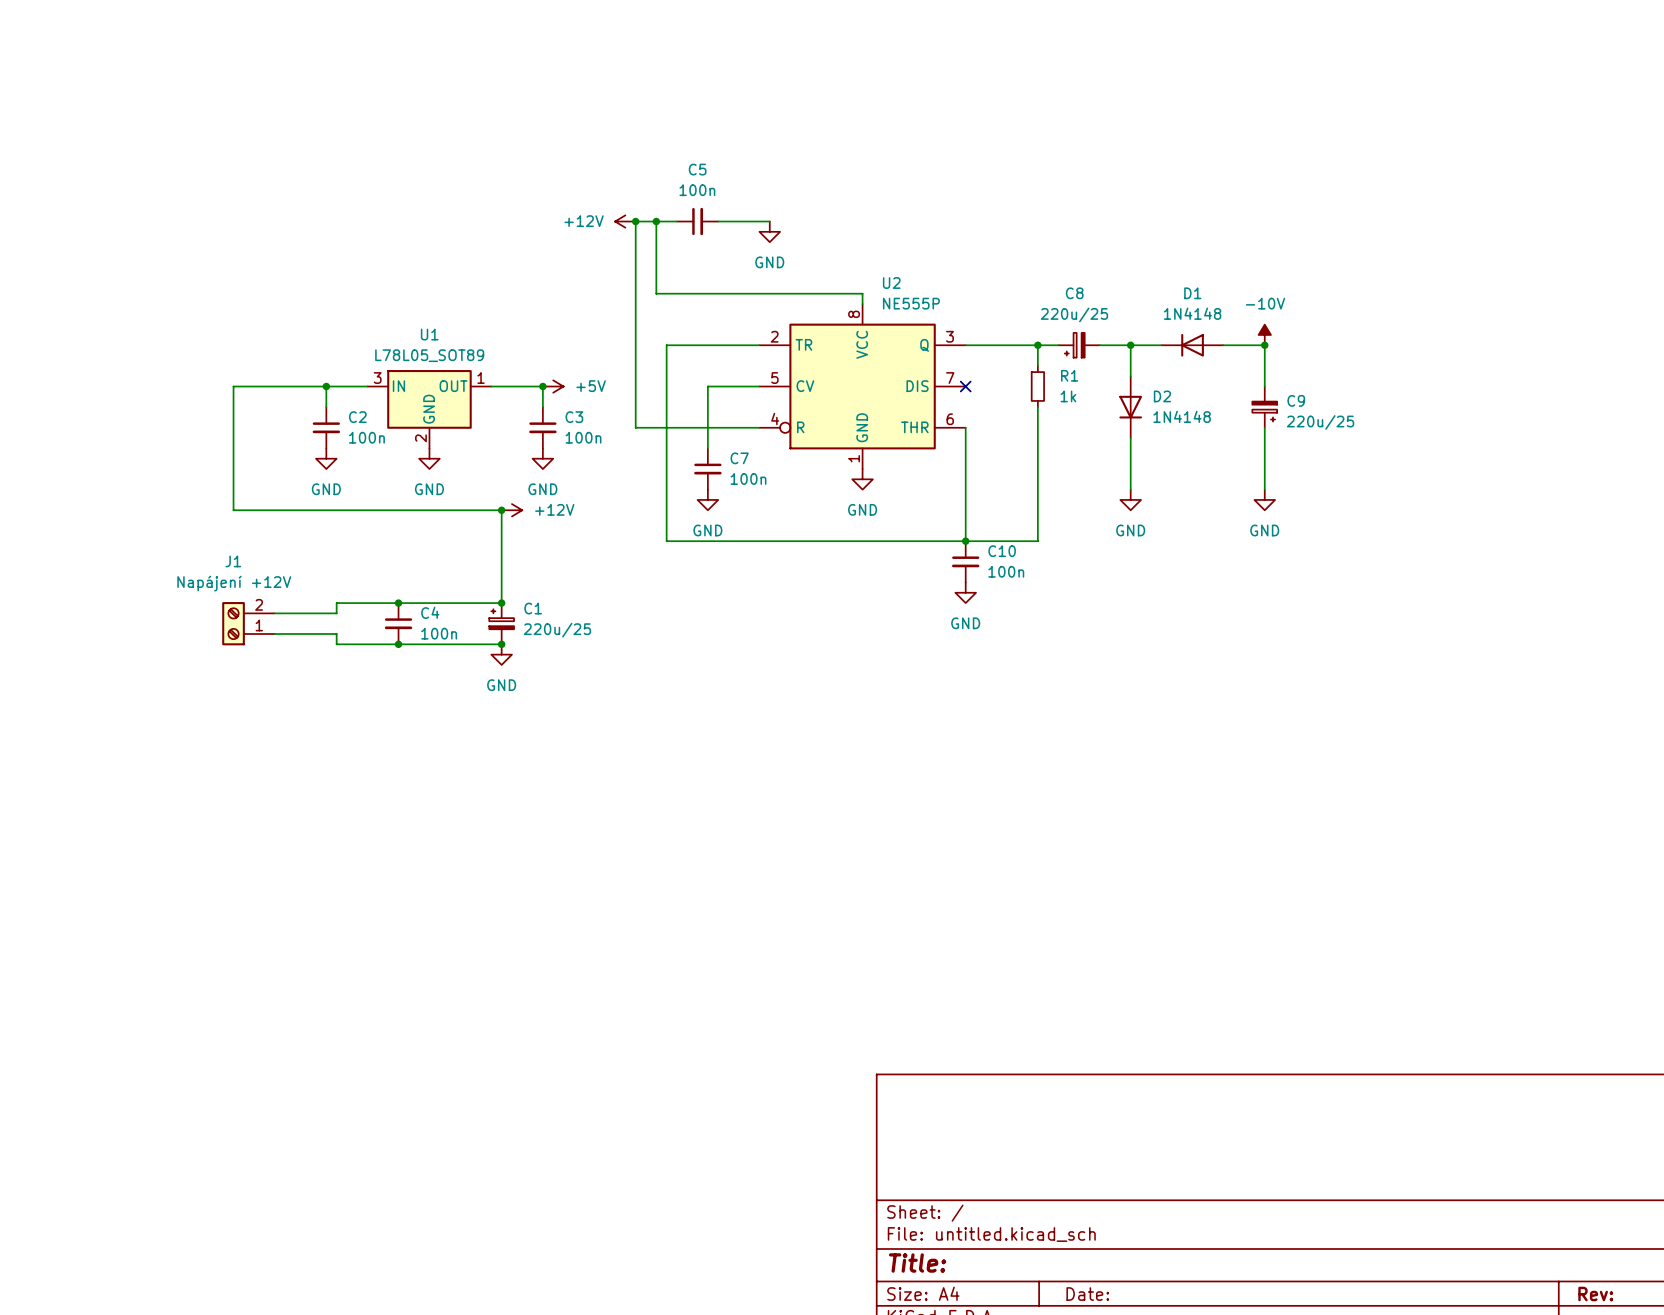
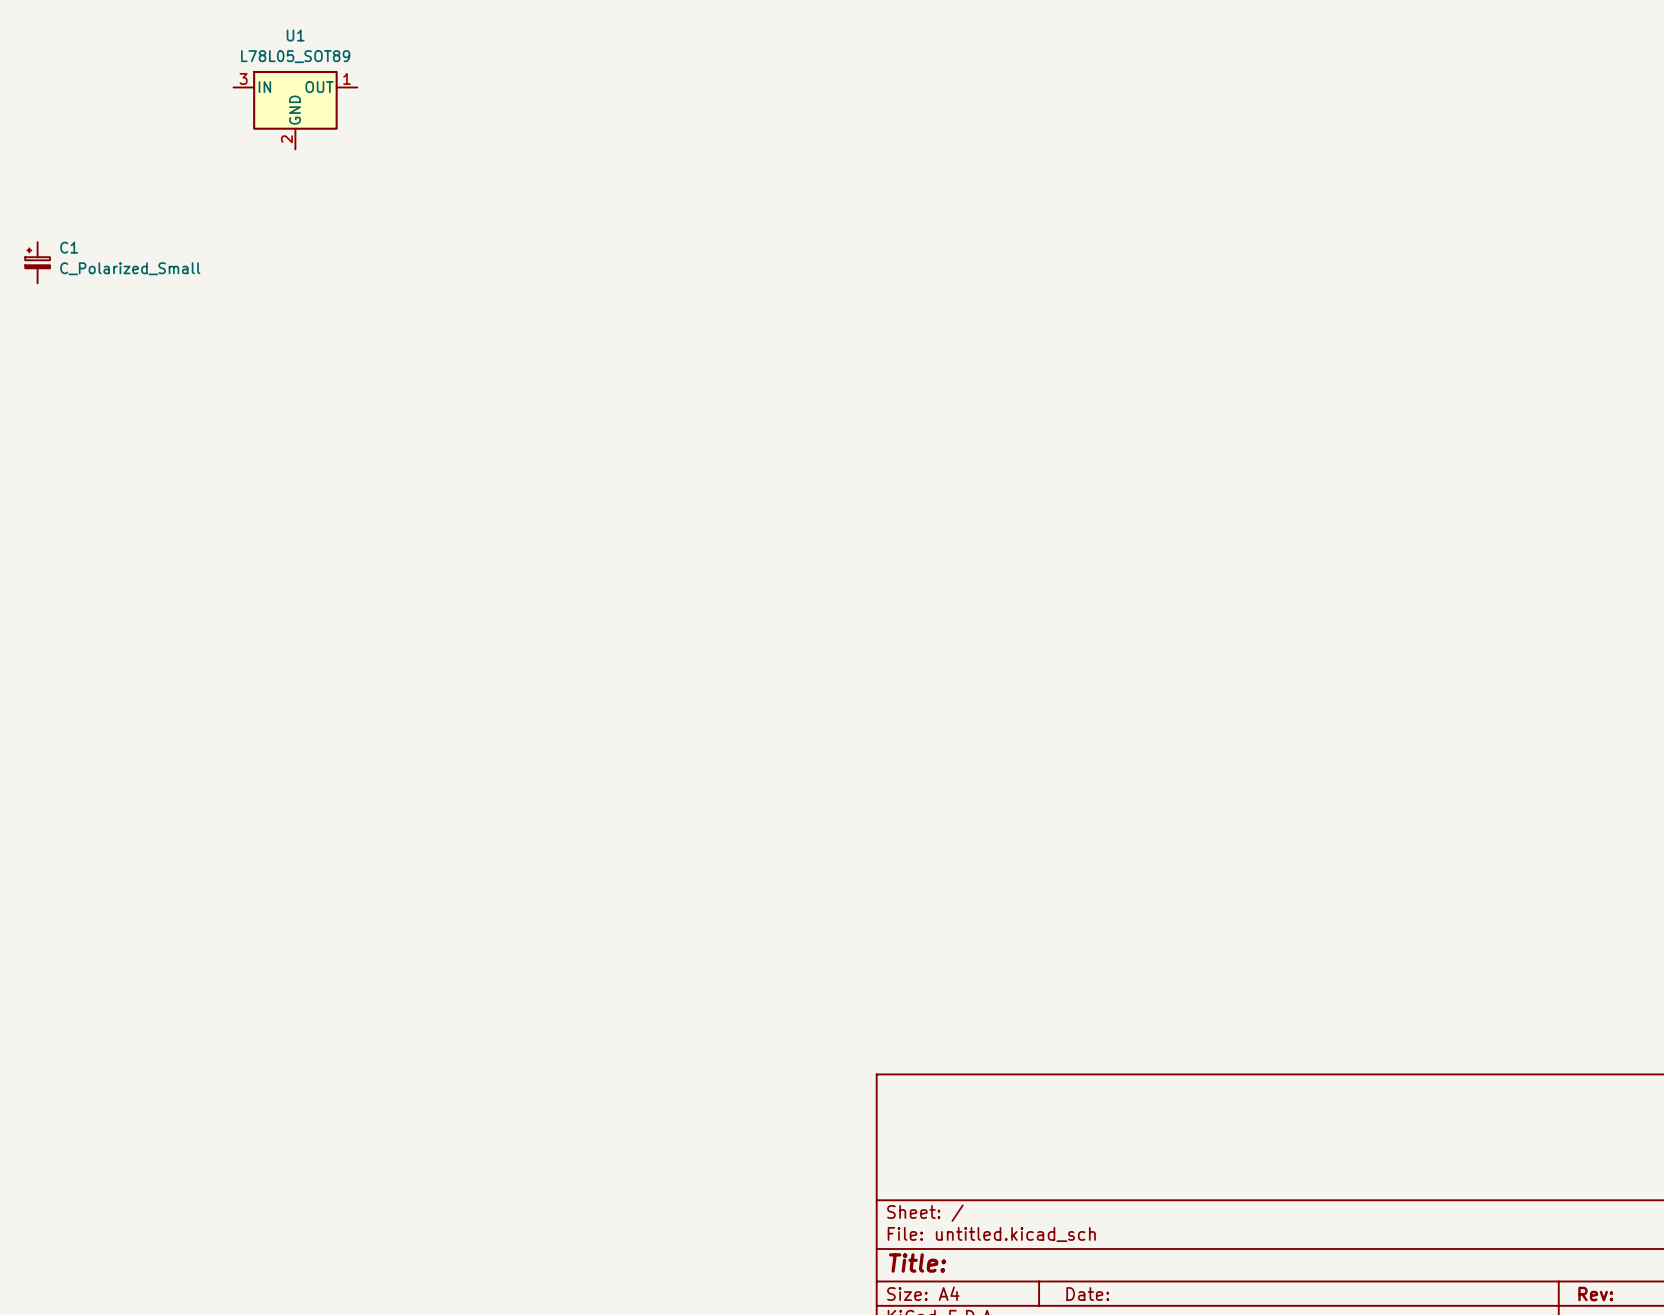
power symbol: +12V (625, 221) -> none
junction: (635, 221) -> none
wire: (656, 221) (656, 293) (862, 293) (862, 304) -> none
junction: (656, 221) -> none
wire: (676, 221) (635, 221) (635, 427) (759, 427) -> none
C5: 100n (697, 221) -> none
wire: (718, 221) (769, 221) -> none
power symbol: GND (769, 231) -> none
power symbol: -10V (1264, 334) -> none
wire: (759, 345) (666, 345) (666, 541) (1037, 541) (1037, 407) -> none
wire: (965, 345) (1058, 345) -> none
wire: (1037, 345) (1037, 365) -> none
junction: (1037, 345) -> none
C8: 220u/25 (1079, 345) -> none
wire: (1099, 345) (1161, 345) -> none
wire: (1130, 345) (1130, 376) -> none
junction: (1130, 345) -> none
D1: 1N4148 (1192, 345) -> none
wire: (1223, 345) (1264, 345) (1264, 386) -> none
junction: (1264, 345) -> none
wire: (326, 386) (326, 407) -> none
junction: (326, 386) -> none
wire: (367, 386) (233, 386) (233, 510) (501, 510) (501, 603) (336, 603) (336, 613) (274, 613) -> none
wire: (491, 386) (542, 386) (542, 407) -> none
junction: (542, 386) -> none
power symbol: +5V (553, 386) -> none
wire: (759, 386) (707, 386) (707, 448) -> none
U2: NE555P (862, 386) -> none
no-connect mark: (965, 386) -> none
R1: 1k (1037, 386) -> none
D2: 1N4148 (1130, 407) -> none
C9: 220u/25 (1264, 407) -> none
U1 position: (429, 409) -> (295, 110)
C2: 100n (326, 427) -> none
C3: 100n (542, 427) -> none
wire: (965, 427) (965, 541) -> none
wire: (1264, 427) (1264, 489) -> none
wire: (1130, 438) (1130, 489) -> none
power symbol: GND (326, 458) -> none
power symbol: GND (429, 458) -> none
power symbol: GND (542, 458) -> none
C7: 100n (707, 469) -> none
power symbol: GND (862, 479) -> none
power symbol: GND (707, 499) -> none
power symbol: GND (1130, 499) -> none
power symbol: GND (1264, 499) -> none
junction: (501, 510) -> none
power symbol: +12V (511, 510) -> none
junction: (965, 541) -> none
C10: 100n (965, 561) -> none
power symbol: GND (965, 592) -> none
junction: (398, 603) -> none
junction: (501, 603) -> none
J1: Napájení +12V (248, 623) -> none
C4: 100n (398, 623) -> none
C1 position: (501, 623) -> (37, 262)
C1 value: 220u/25 (557, 630) -> C_Polarized_Small (130, 268)
wire: (274, 634) (336, 634) (336, 644) (501, 644) -> none
junction: (398, 644) -> none
junction: (501, 644) -> none
power symbol: GND (501, 654) -> none

